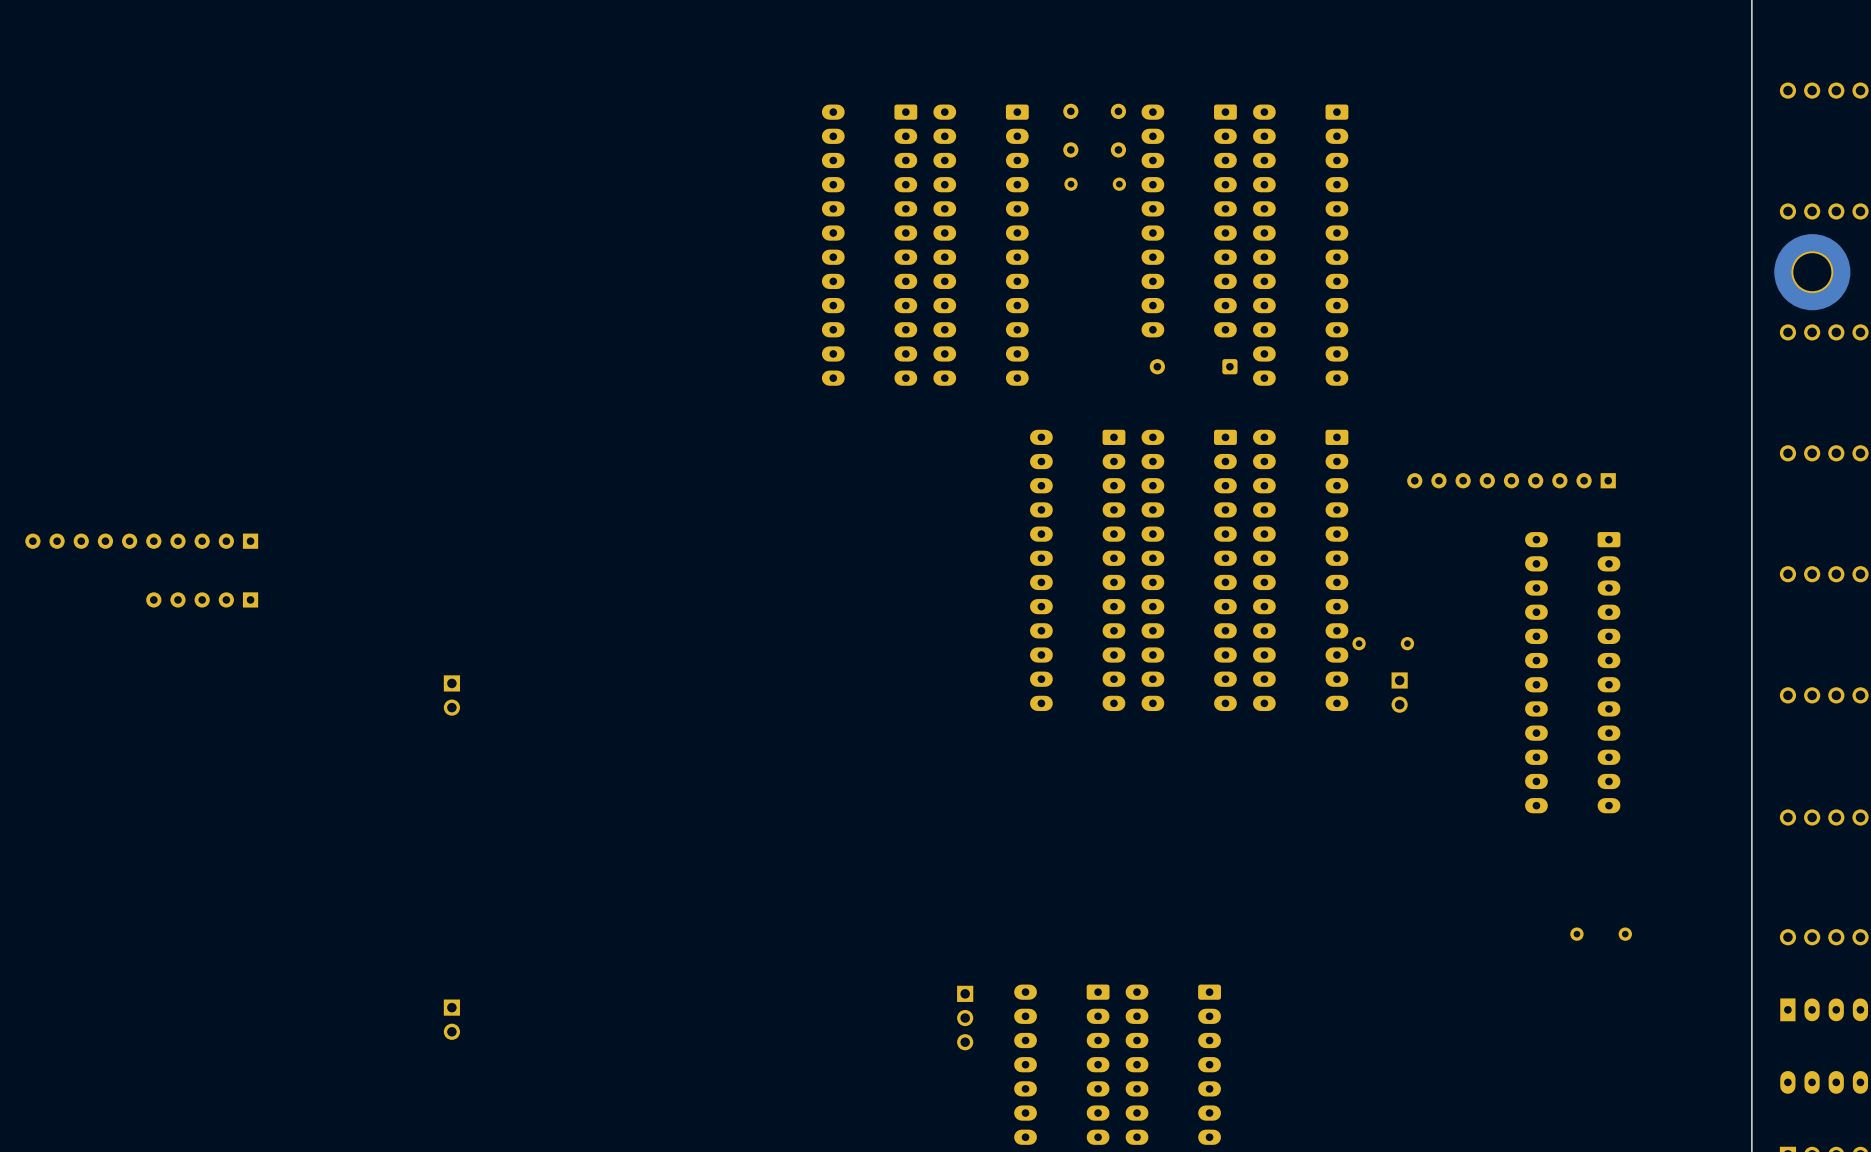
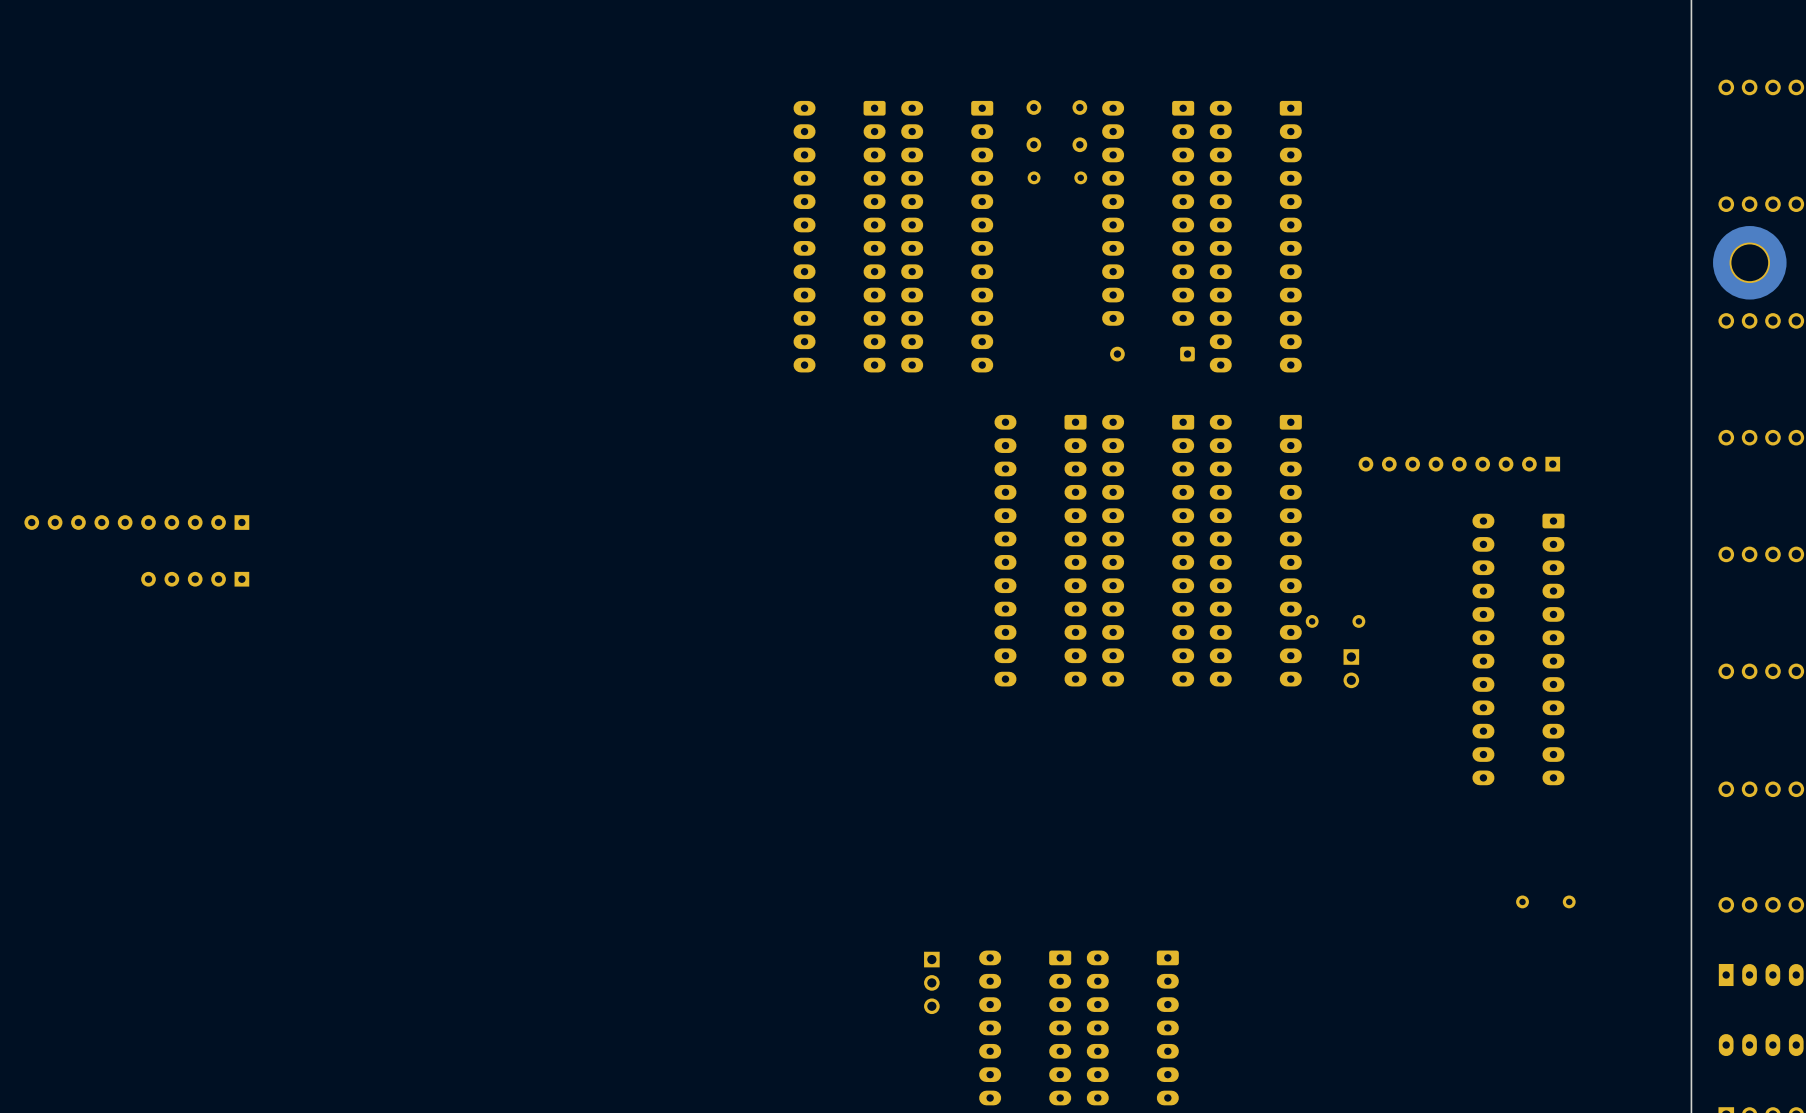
part: (451, 695) -> none
part: (451, 1019) -> none

